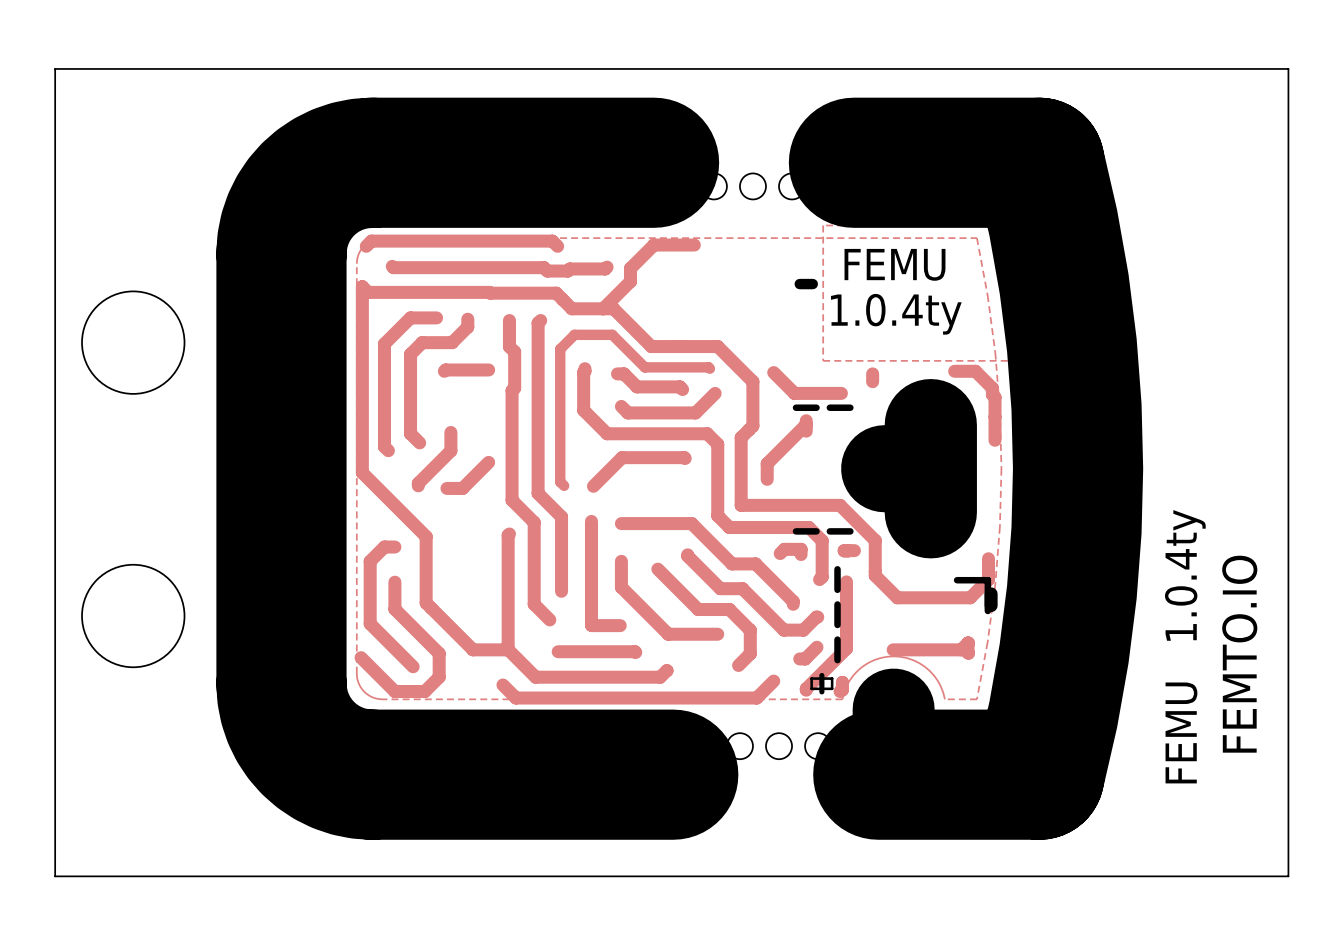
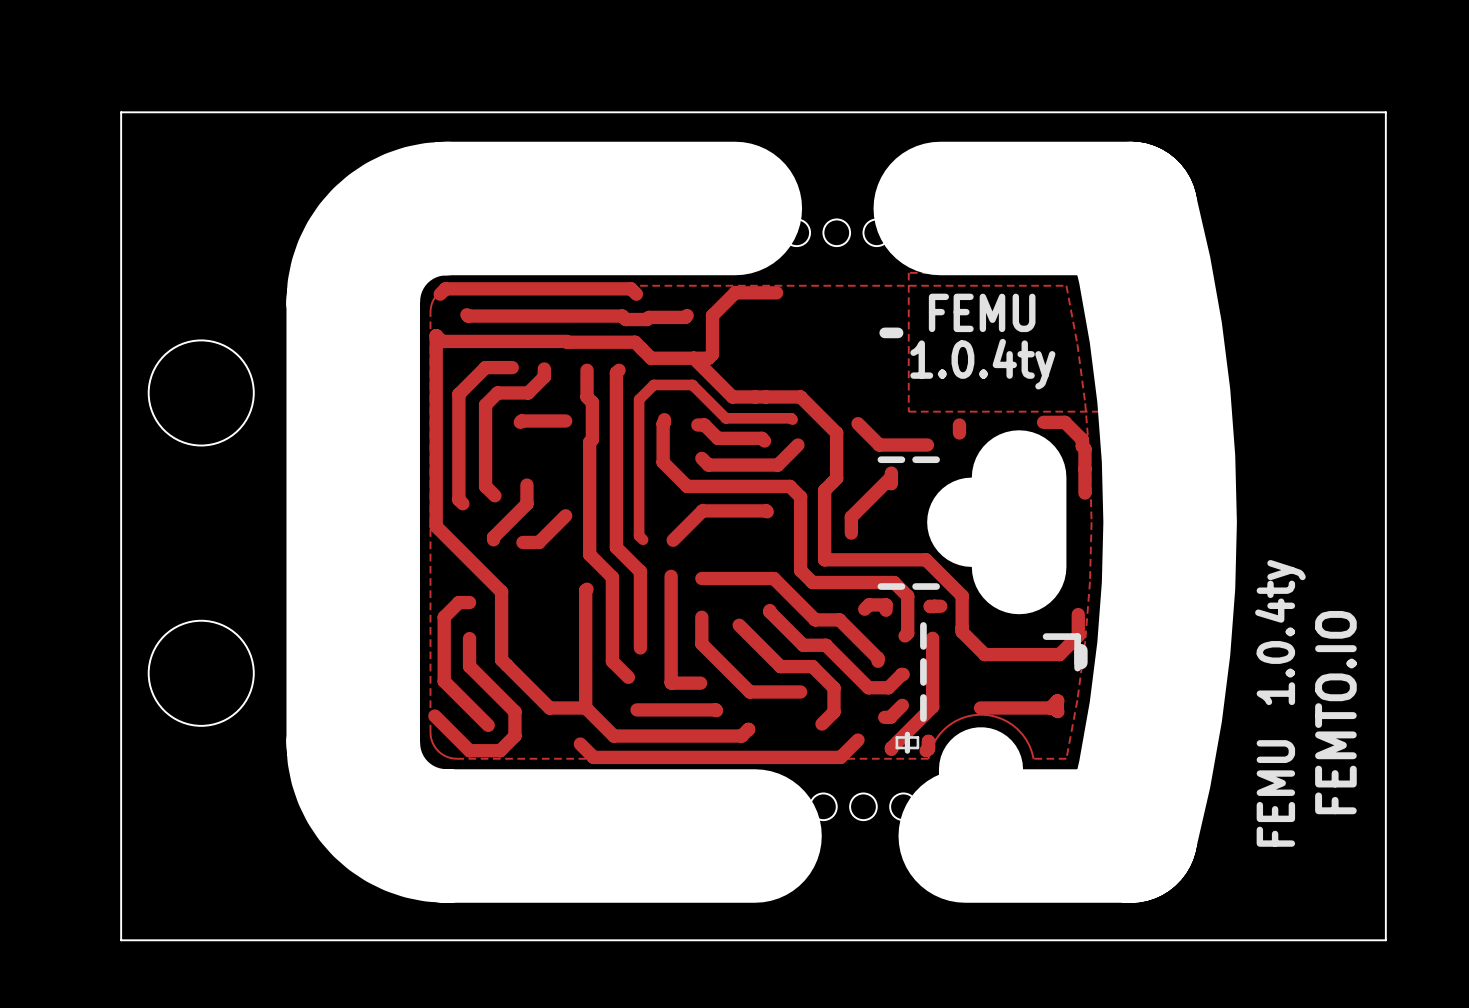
track: (631, 267) (630, 281) (603, 308) -> (712, 315) (712, 354) (708, 358) (693, 358)

